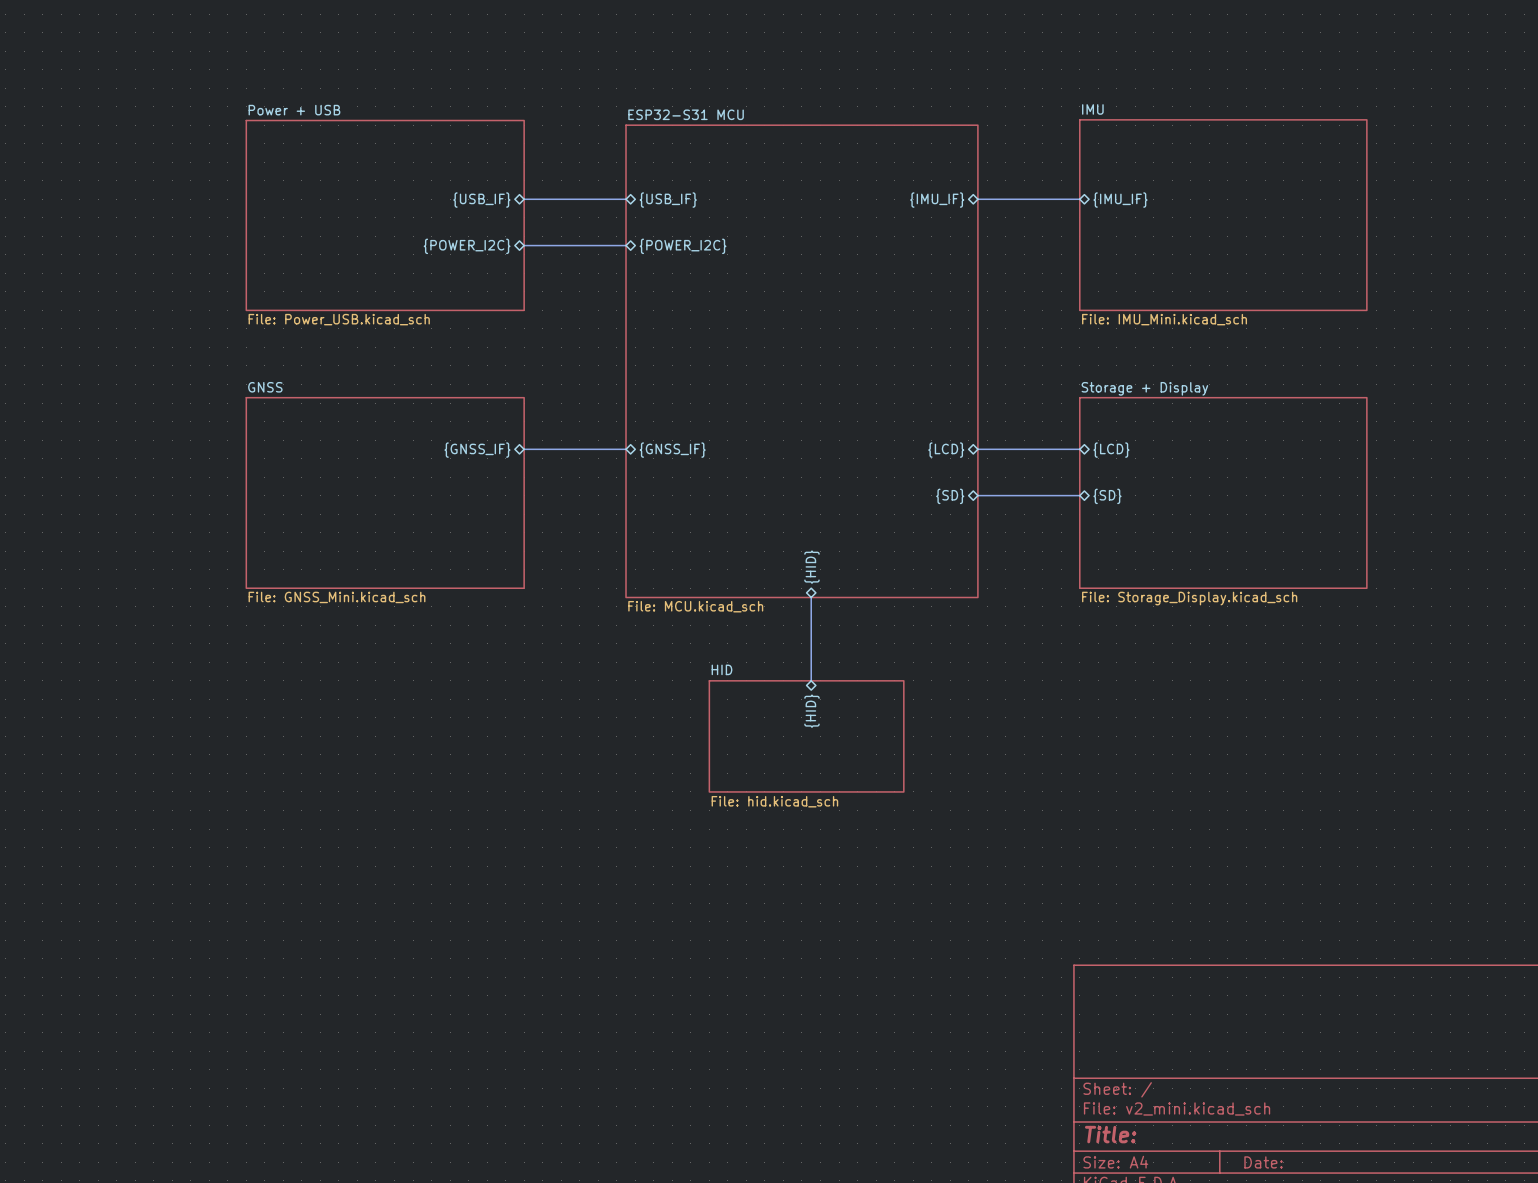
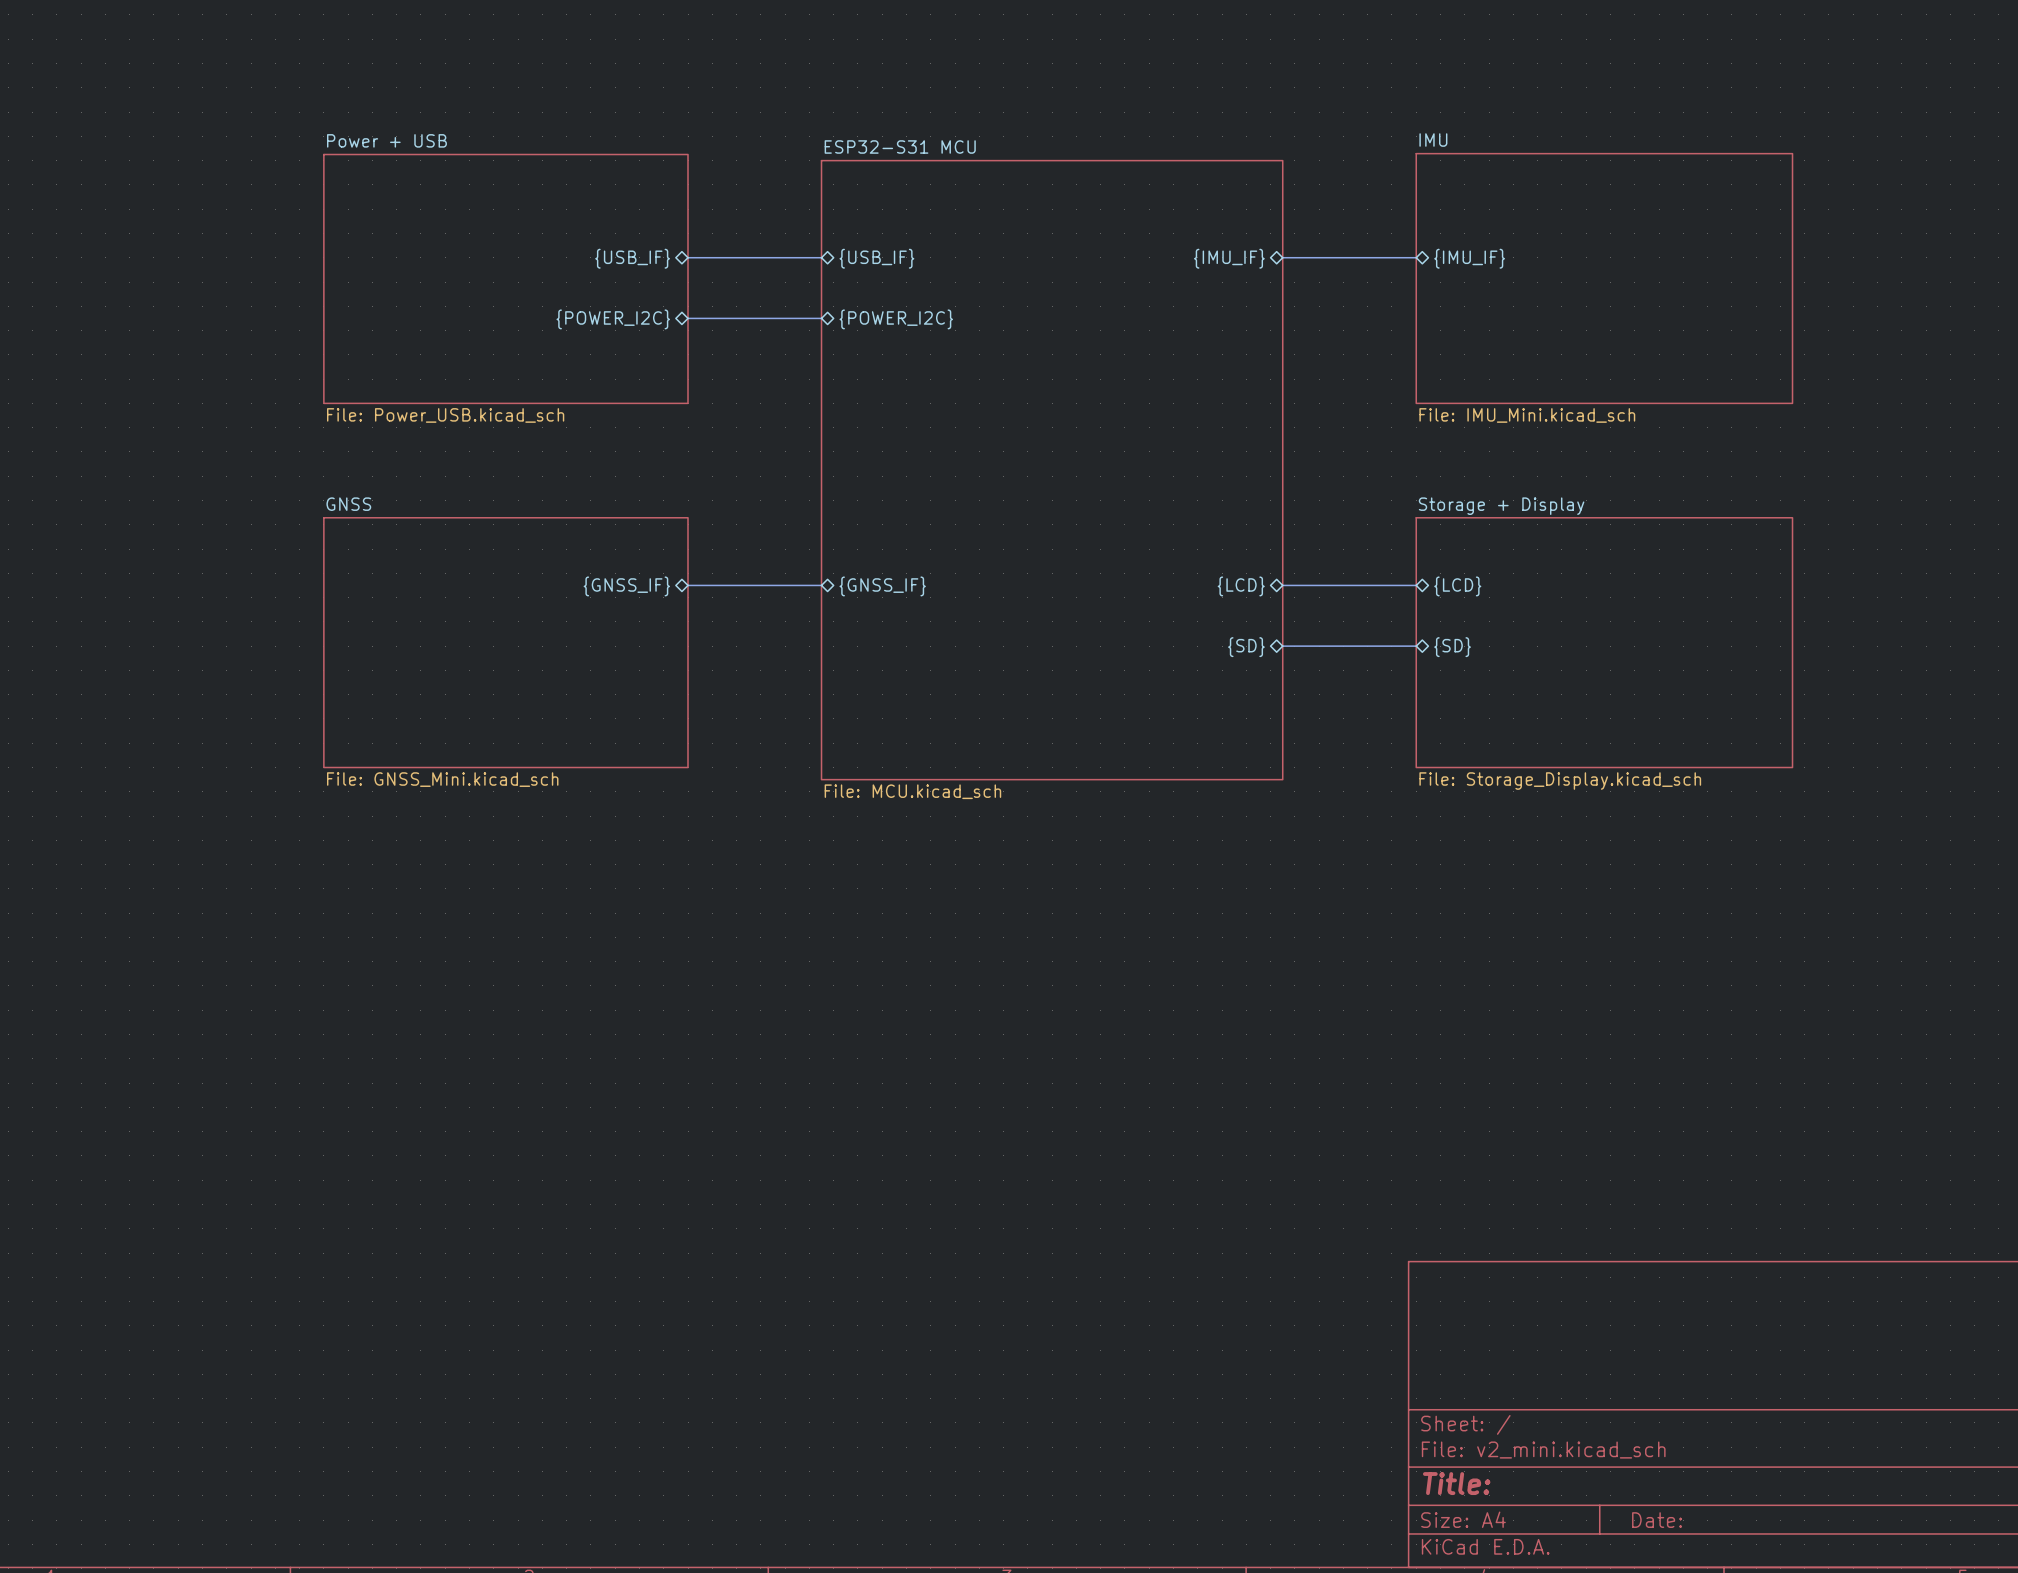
sheet pin: {HID} (811, 567) -> none
bus: (811, 597) (811, 680) -> none
sheet pin: {HID} (811, 711) -> none
sheet HID: File: hid.kicad_sch (806, 736) -> none

